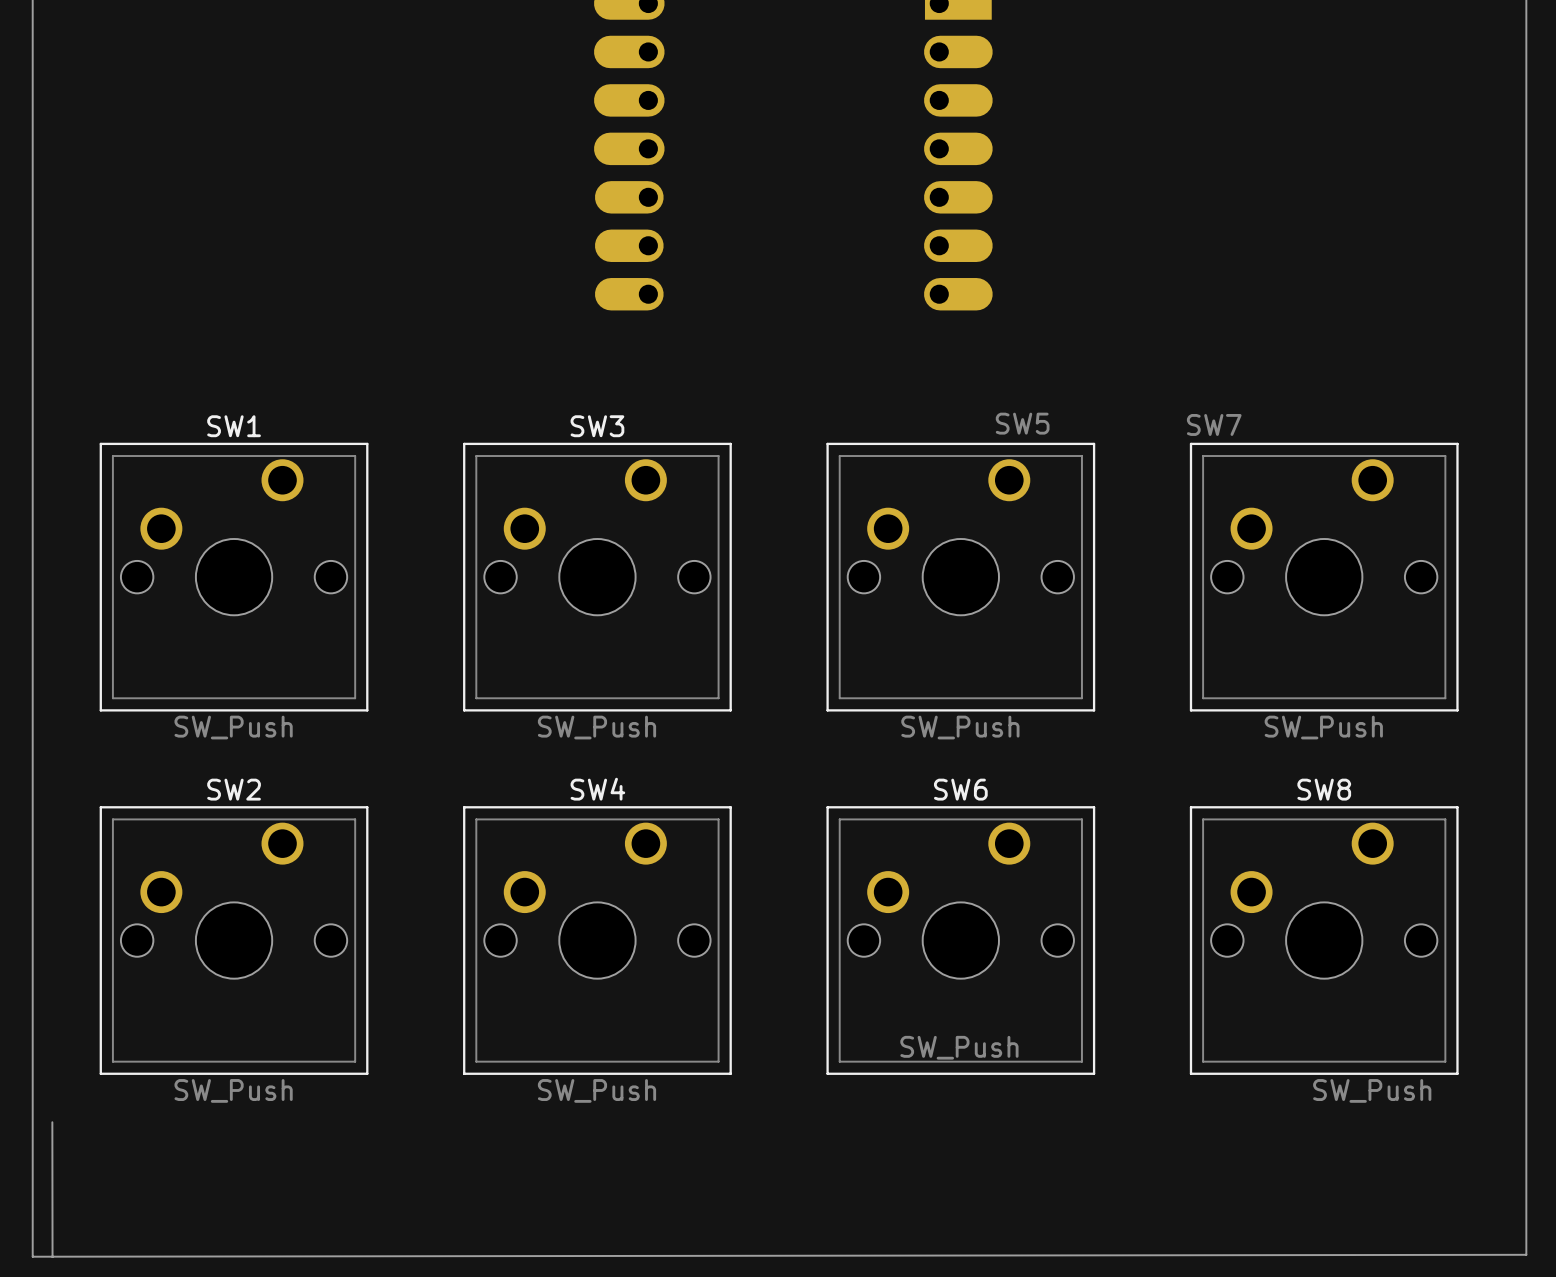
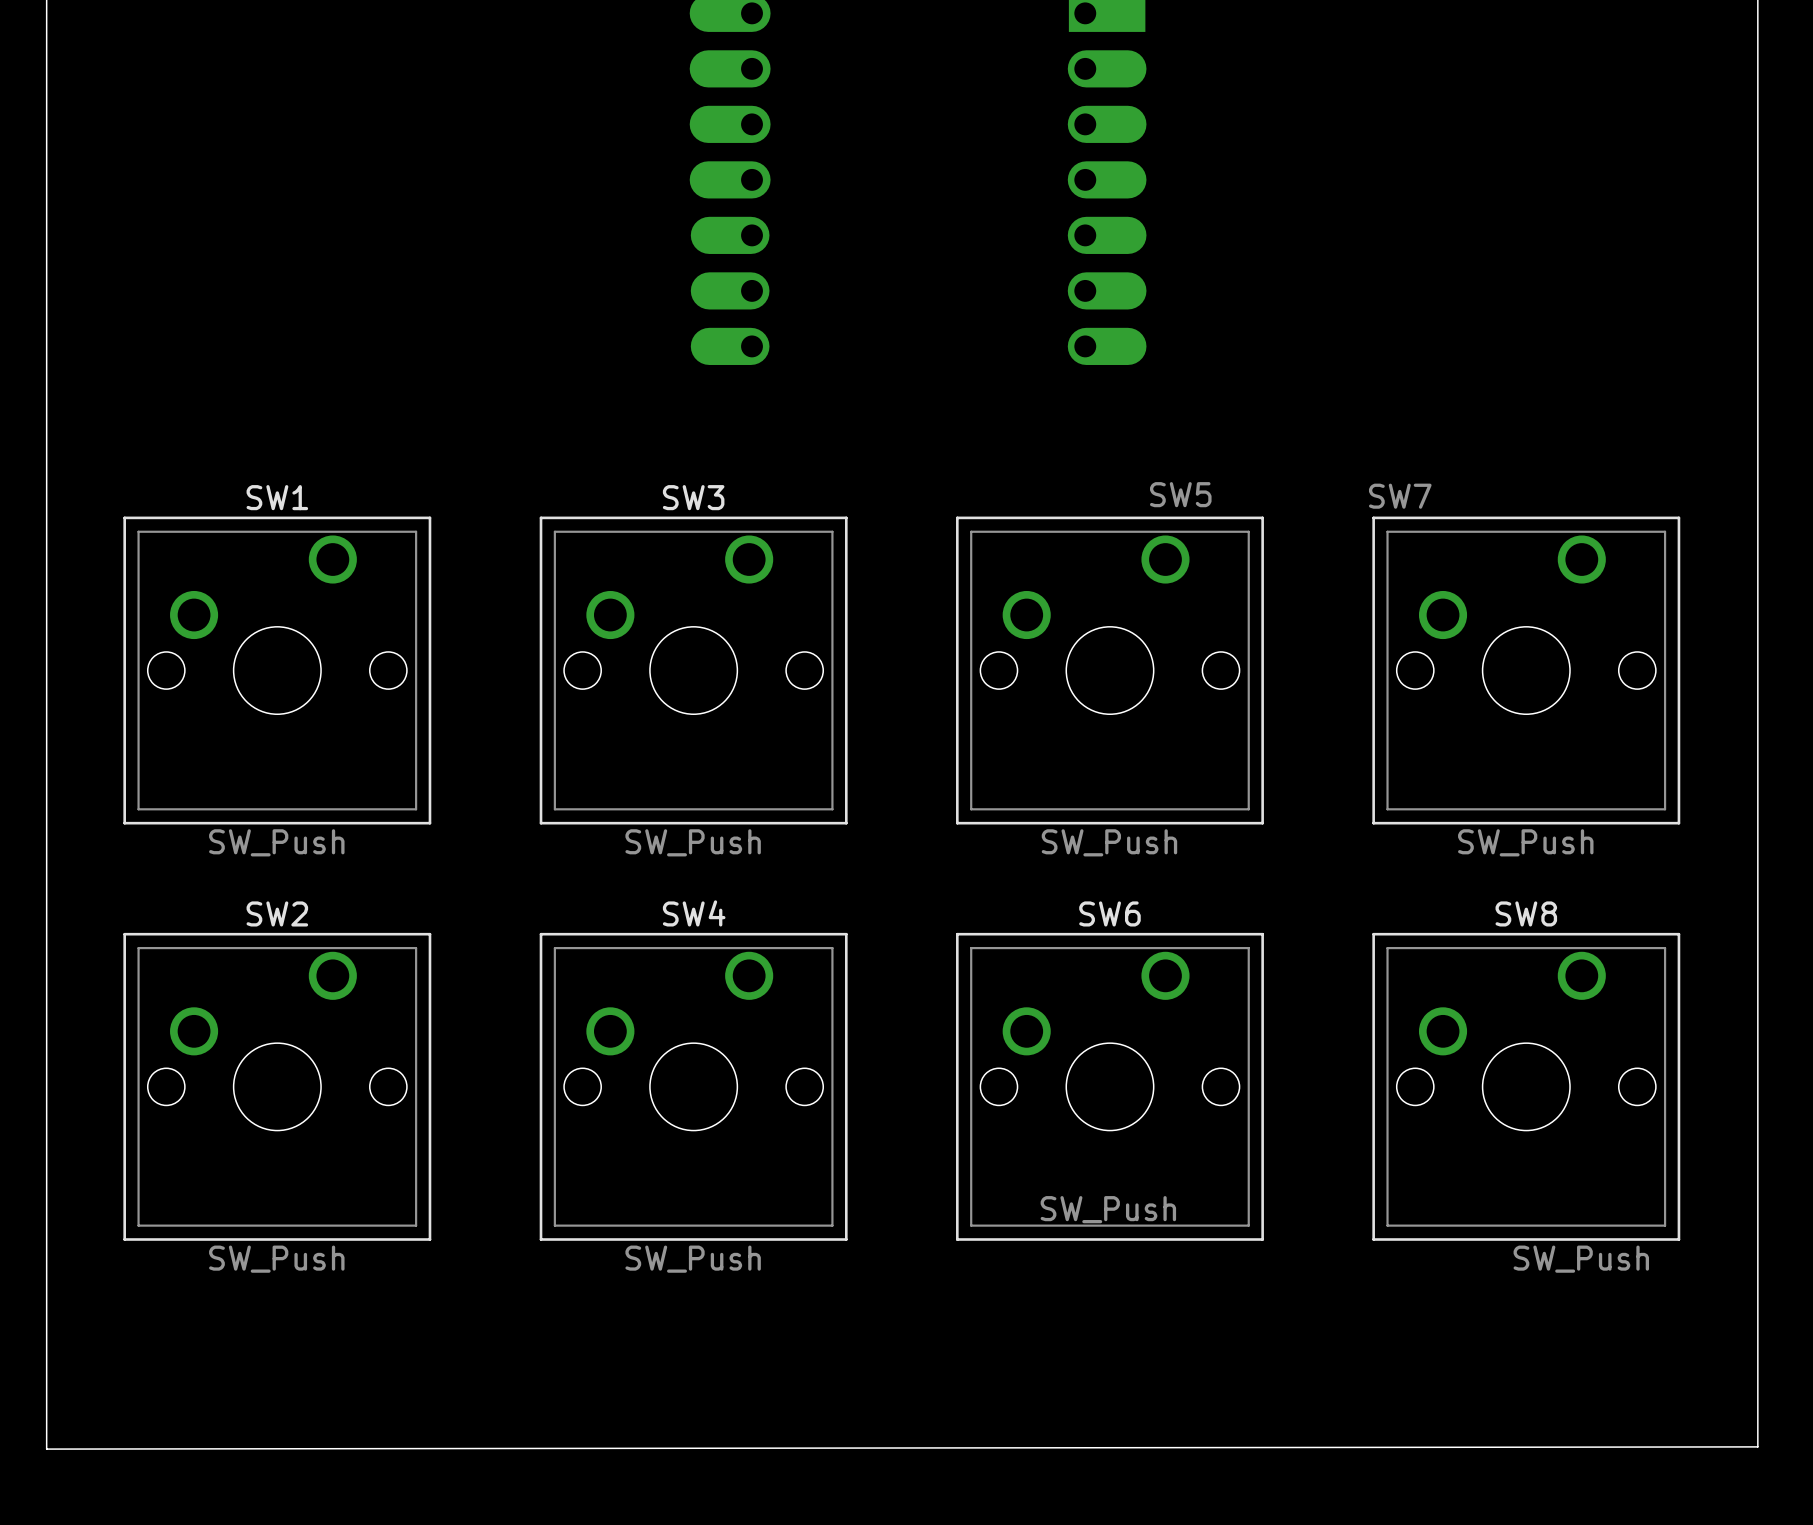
board edge: (52, 1122) (52, 1257) -> none

